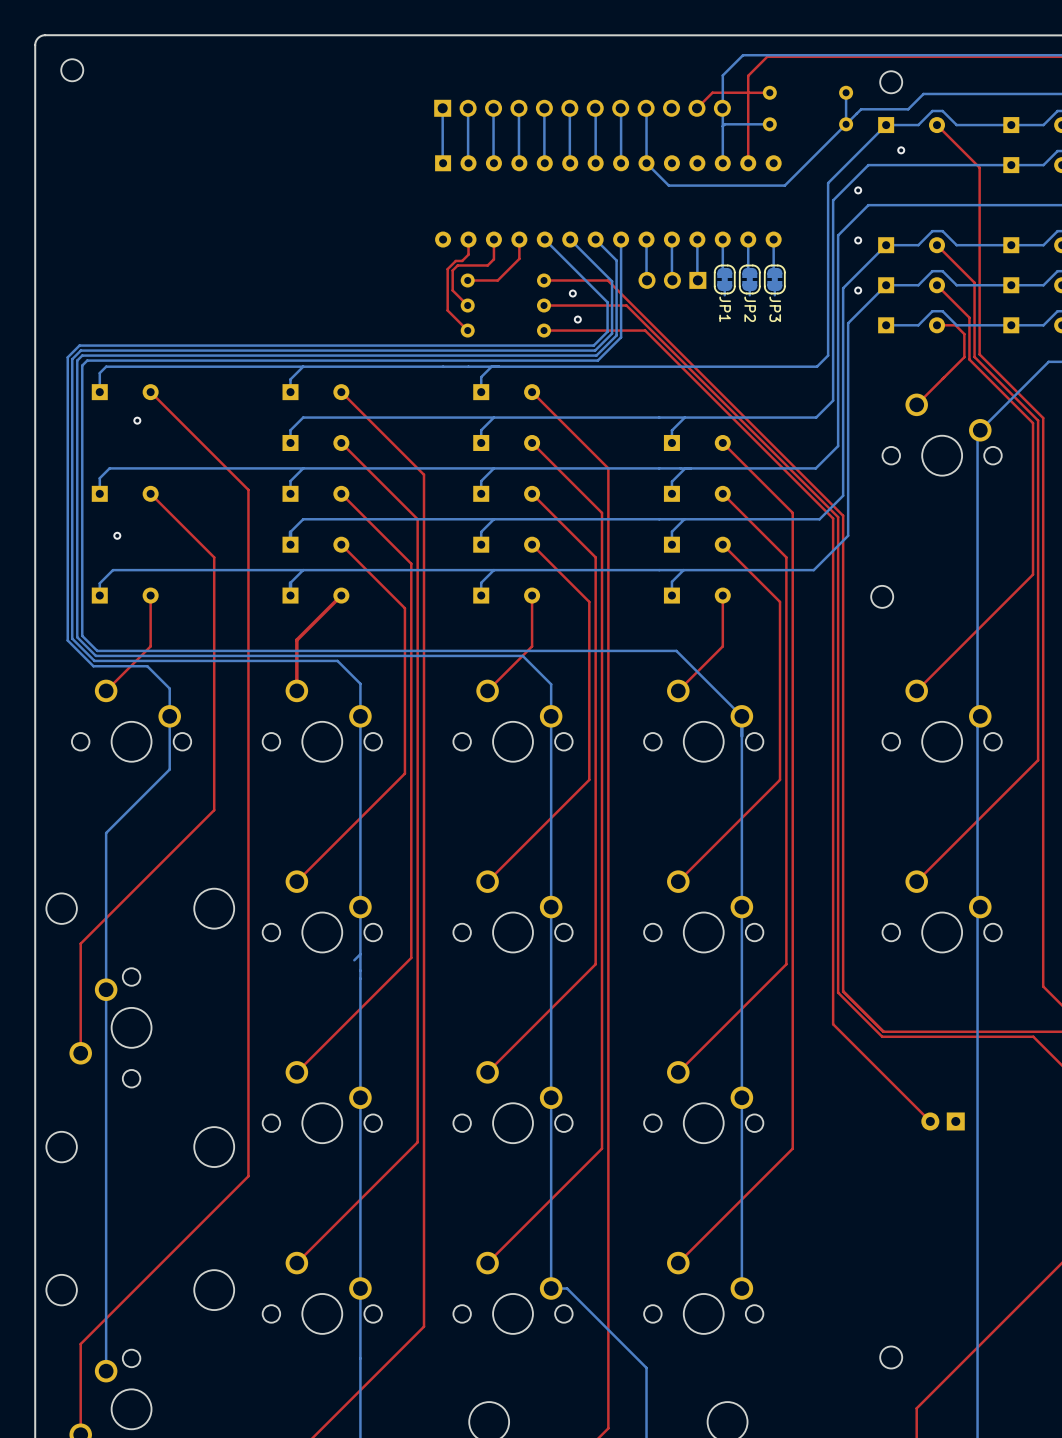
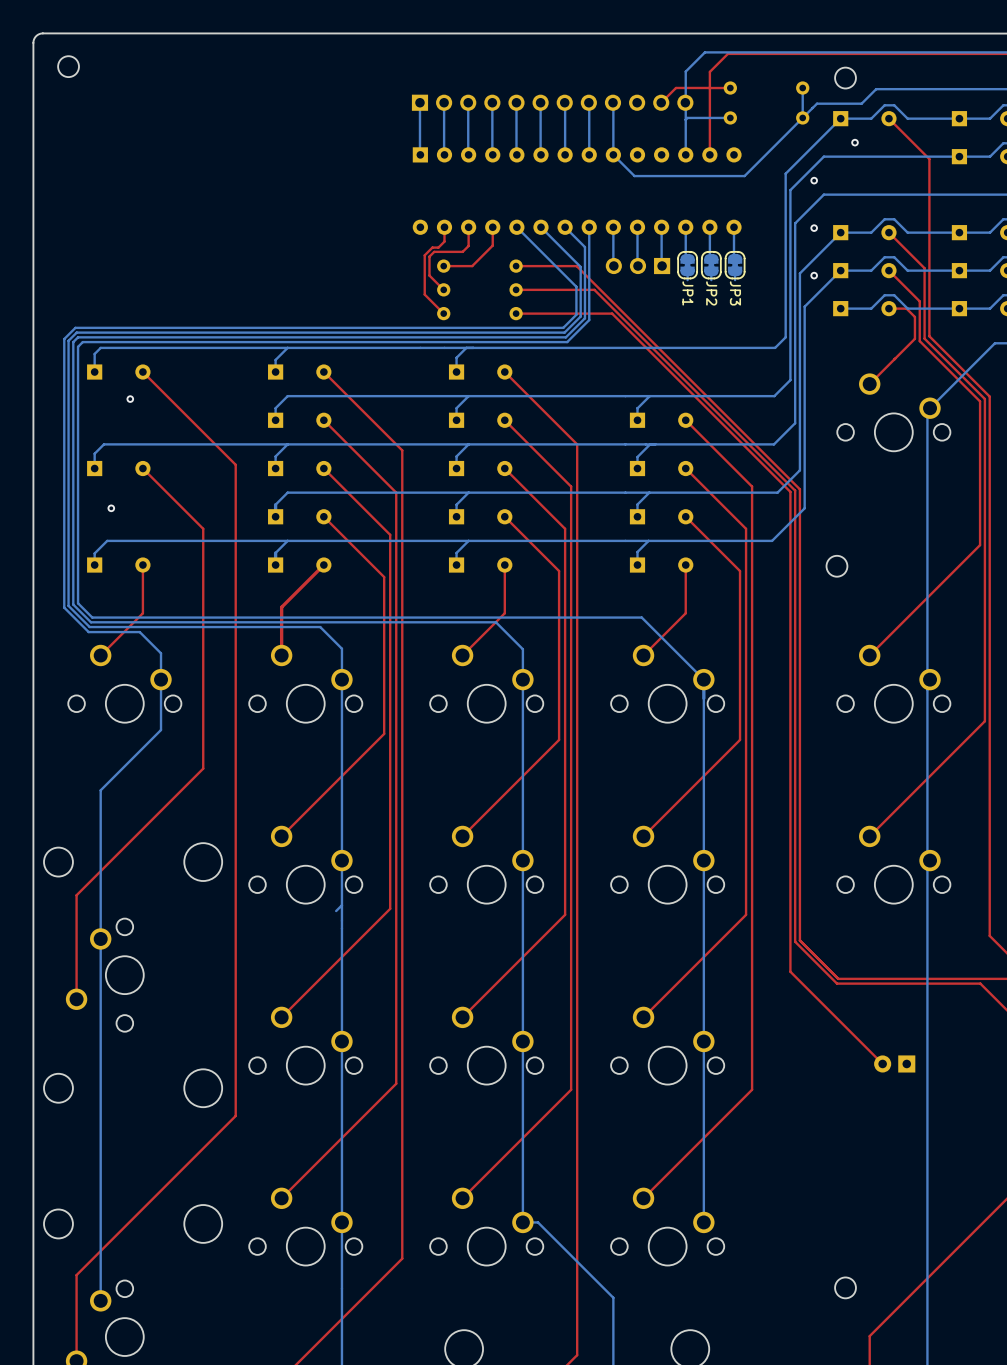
via: (572, 293) -> none
via: (577, 319) -> none

